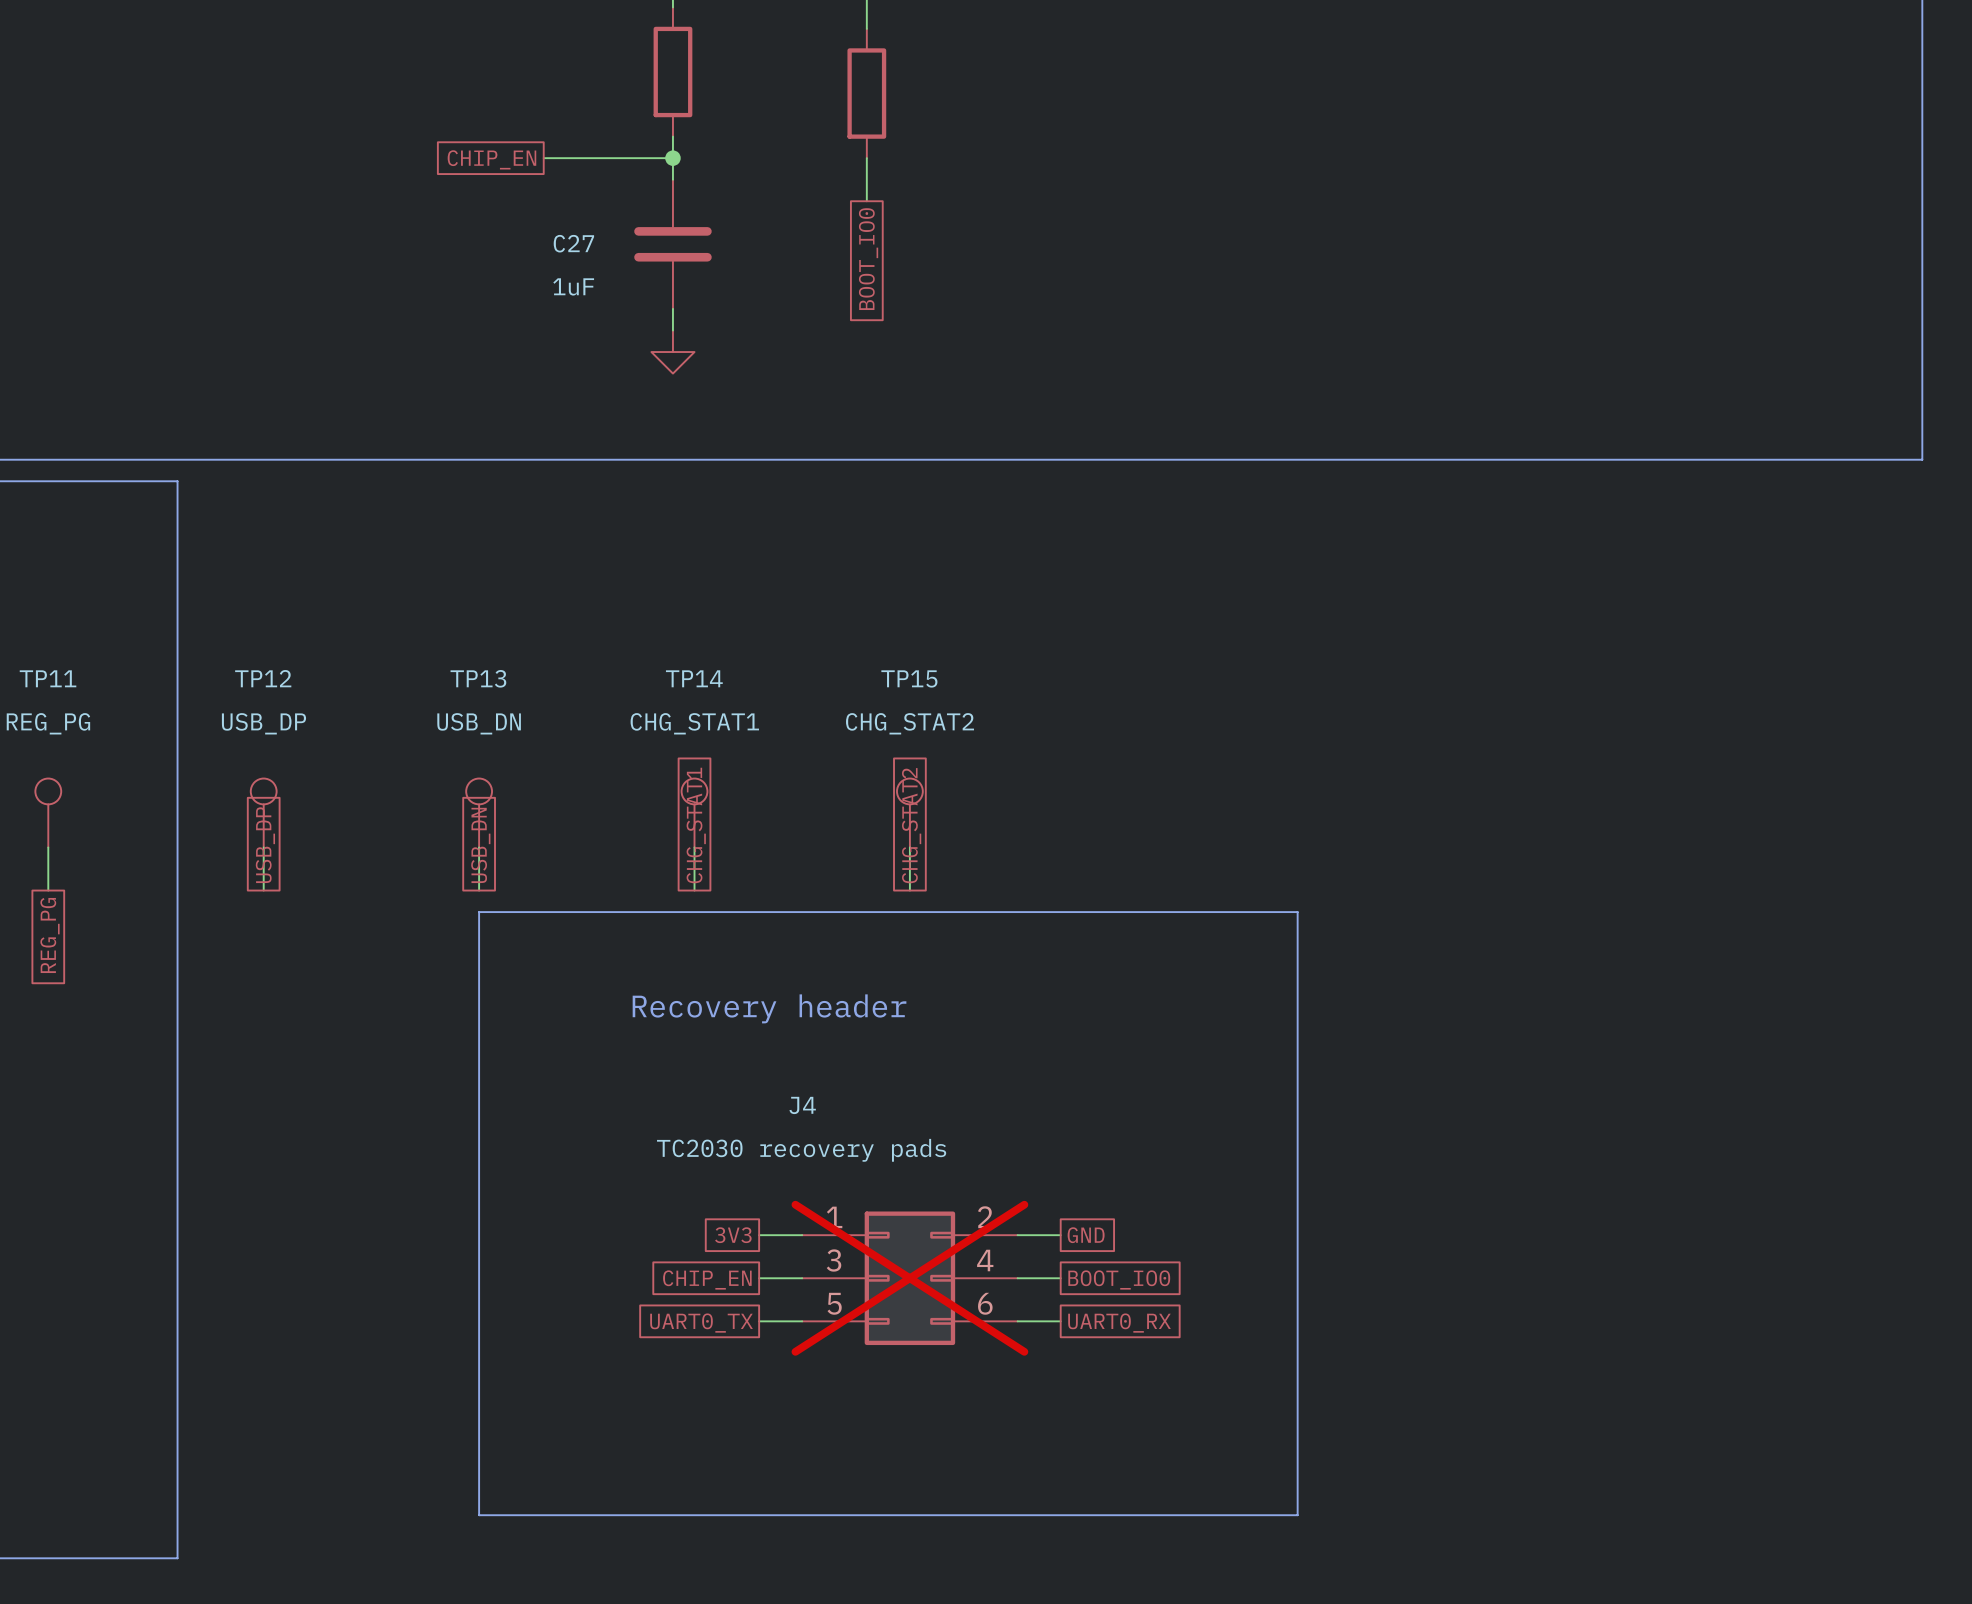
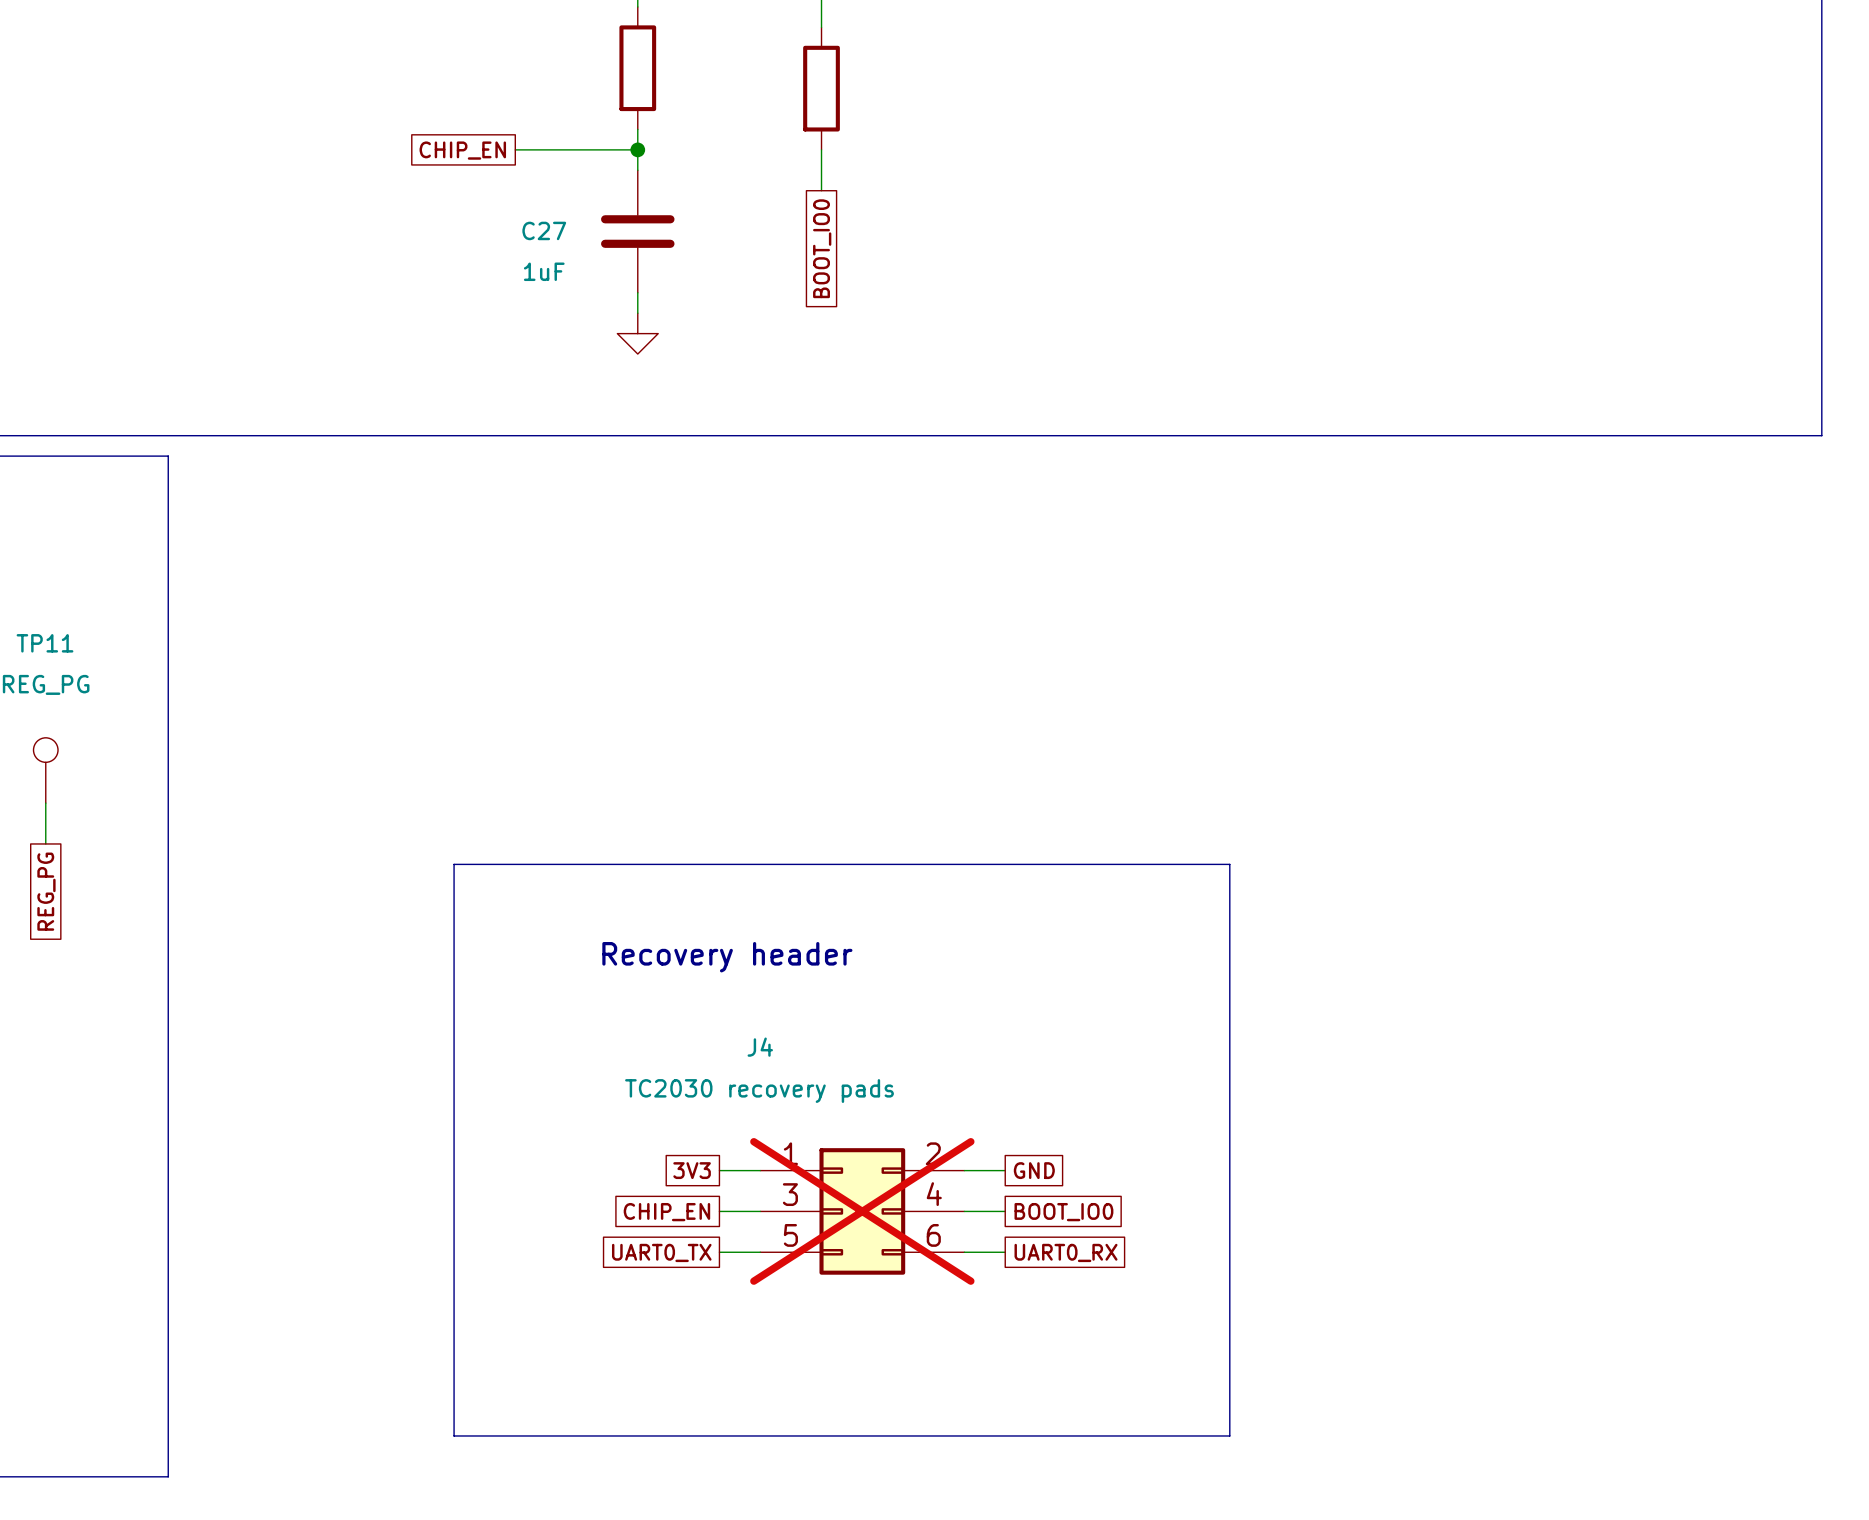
TP12: USB_DP (263, 812) -> none
TP13: USB_DN (479, 812) -> none
TP14: CHG_STAT1 (694, 812) -> none
TP15: CHG_STAT2 (909, 812) -> none
global label: CHG_STAT1 (696, 825) -> none
global label: CHG_STAT2 (911, 825) -> none
global label: USB_DP (265, 845) -> none
global label: USB_DN (480, 845) -> none
wire: (263, 847) (263, 890) -> none
wire: (479, 847) (479, 890) -> none
wire: (694, 847) (694, 890) -> none
wire: (909, 847) (909, 890) -> none

